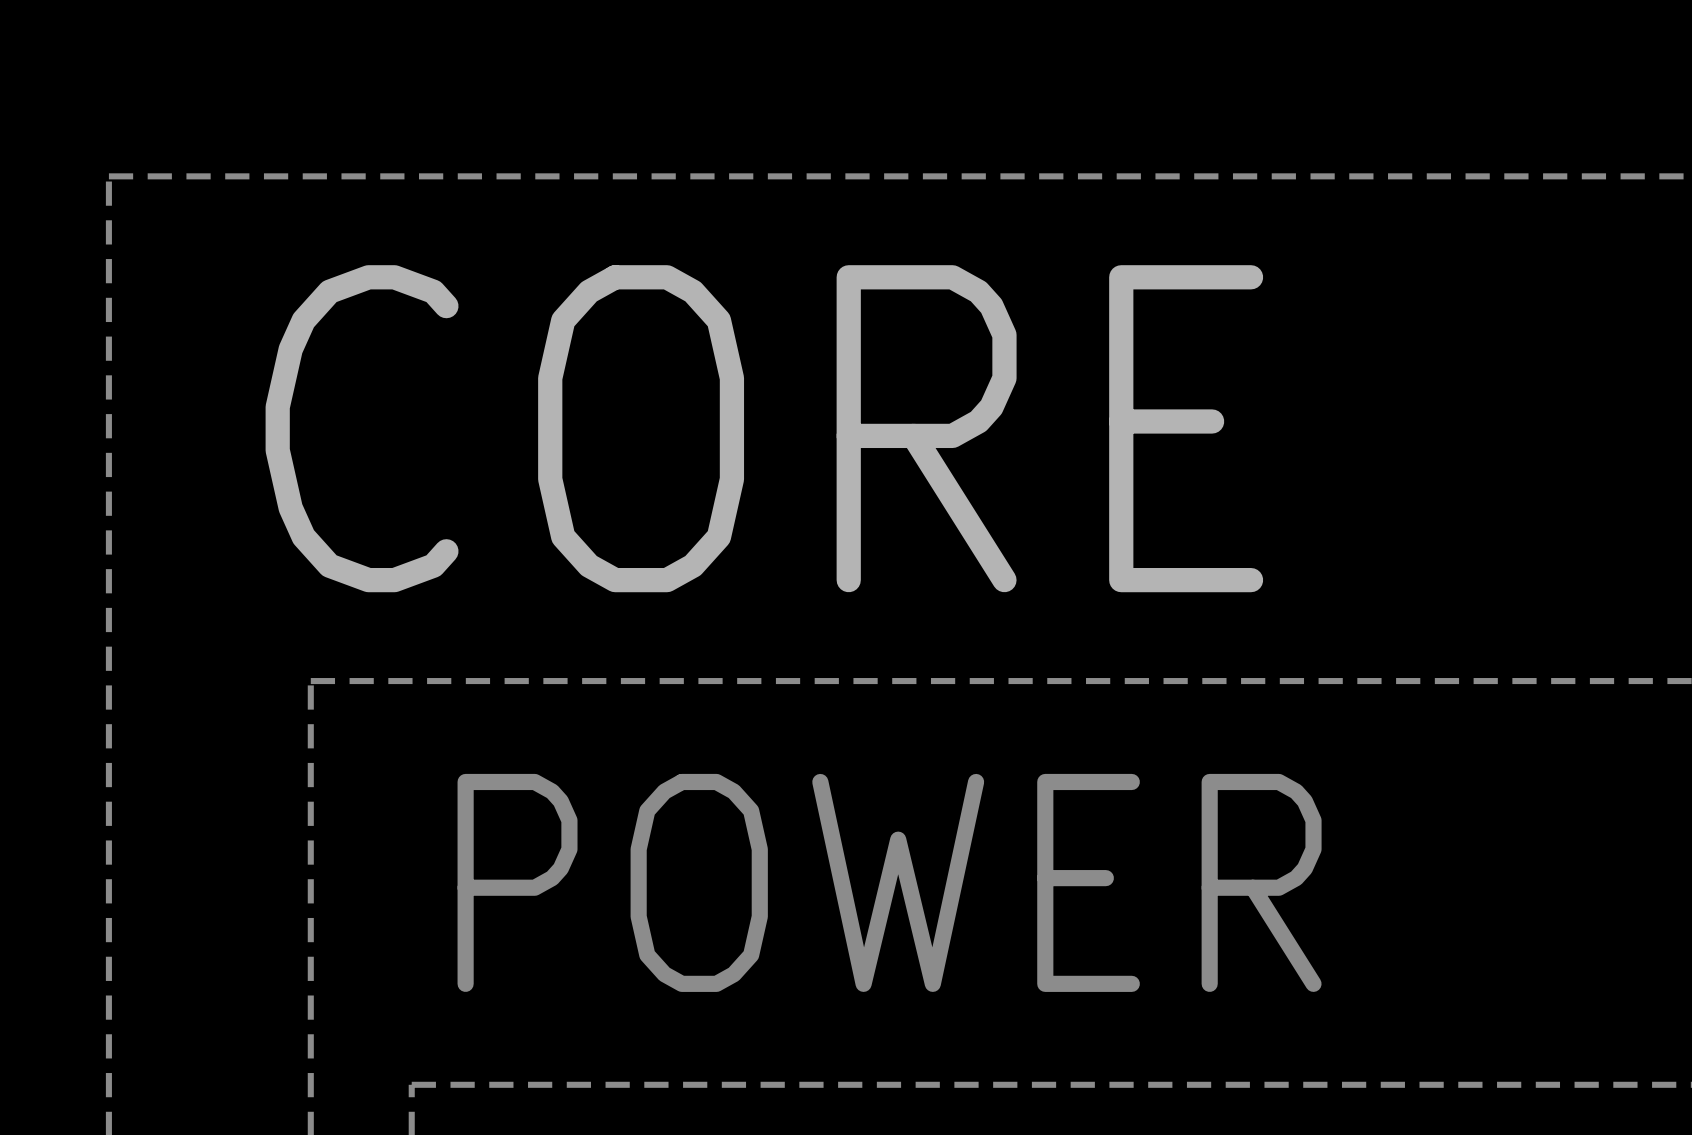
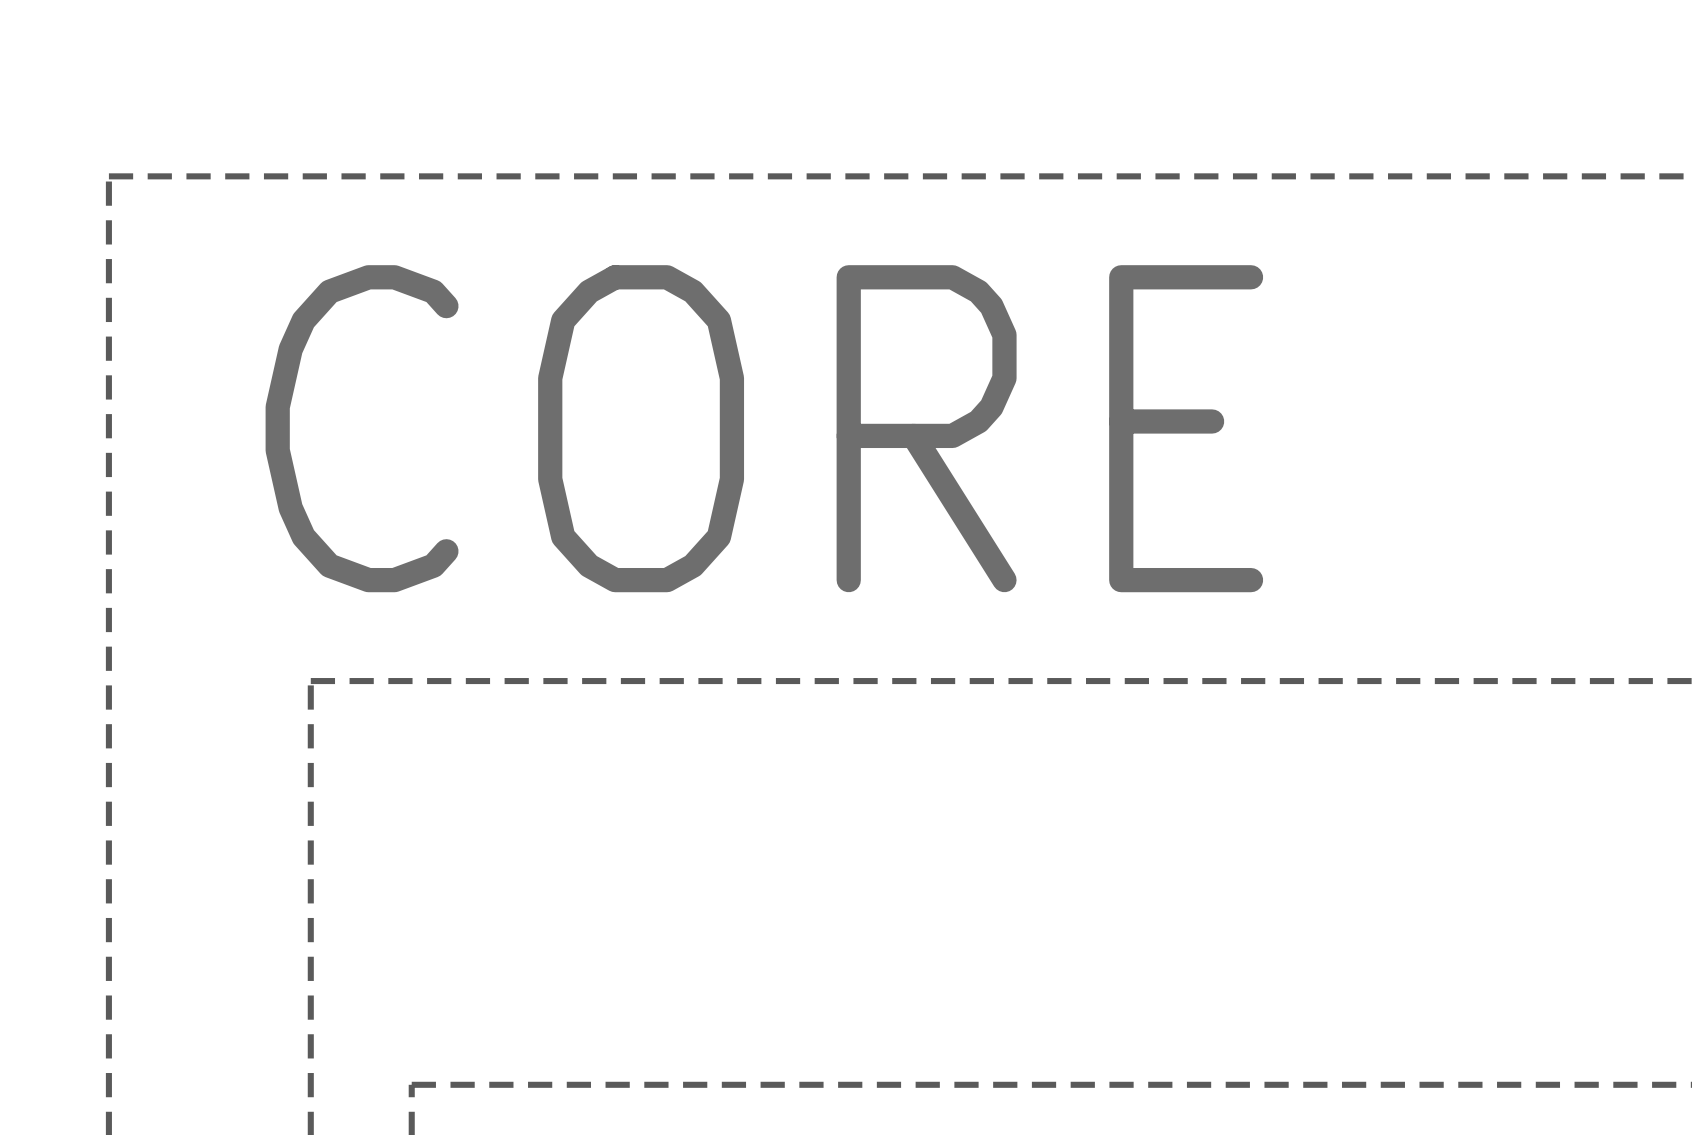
text: POWER (889, 882) -> none

